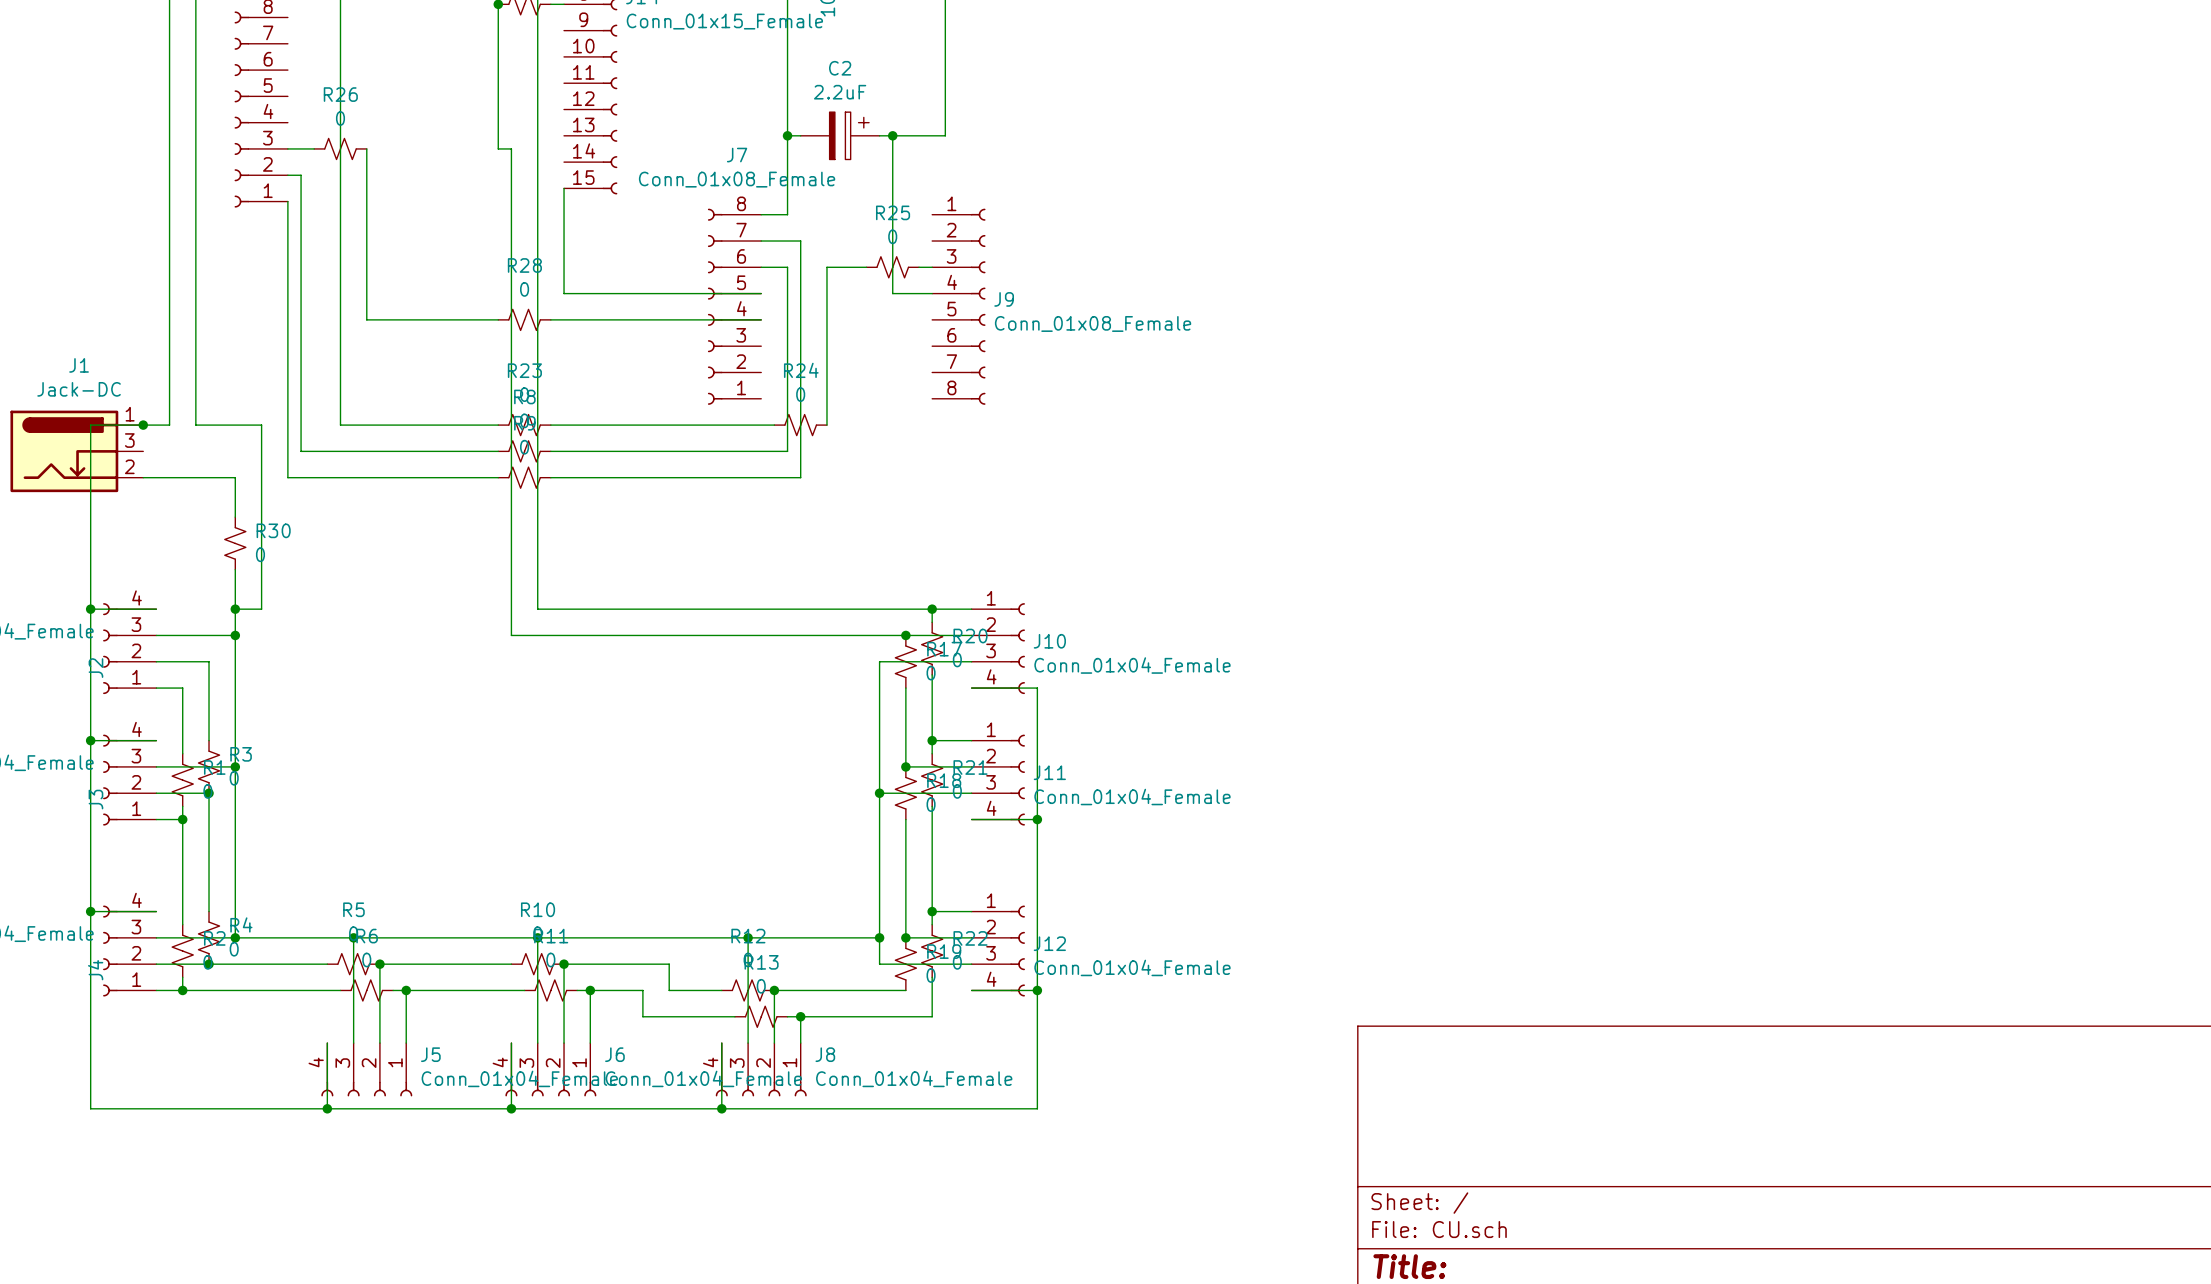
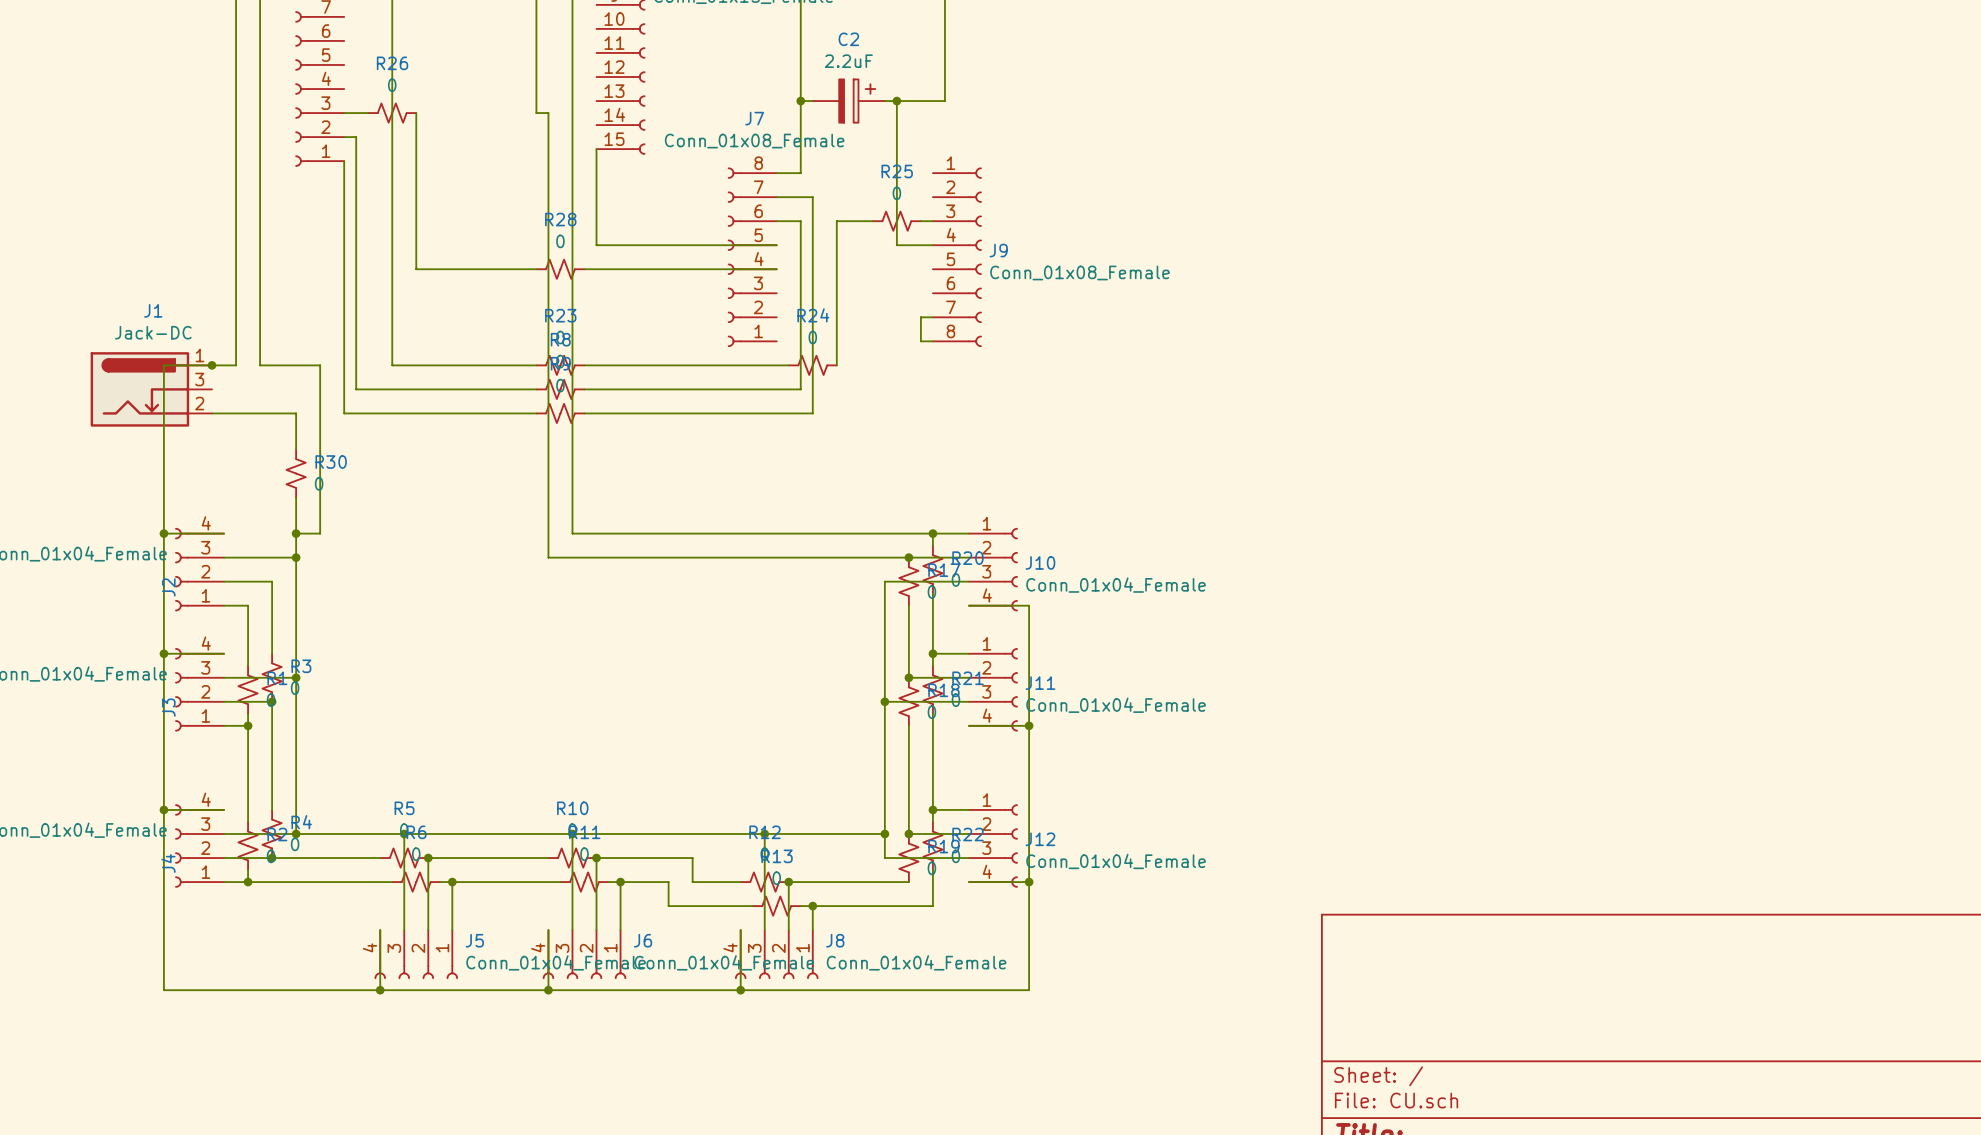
wire: none -> (932, 317) (920, 317) (920, 341) (932, 341)

